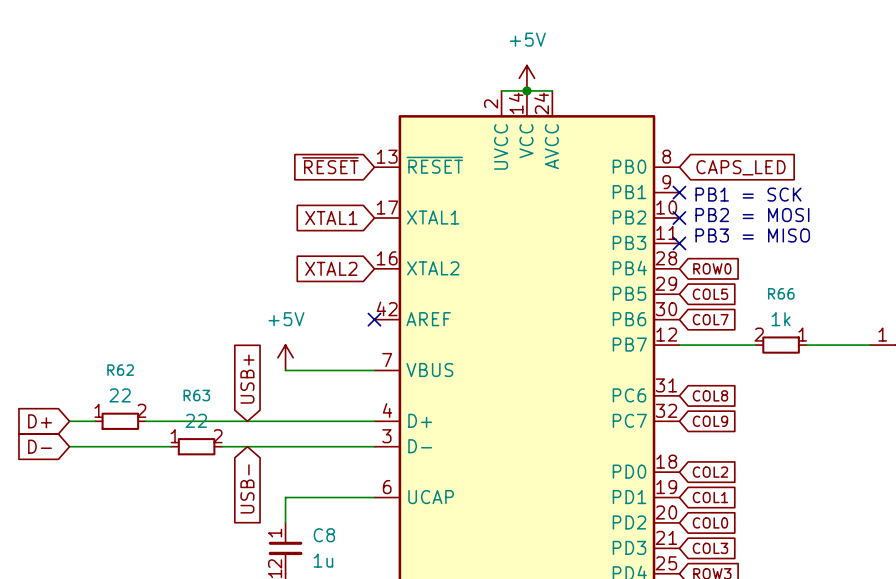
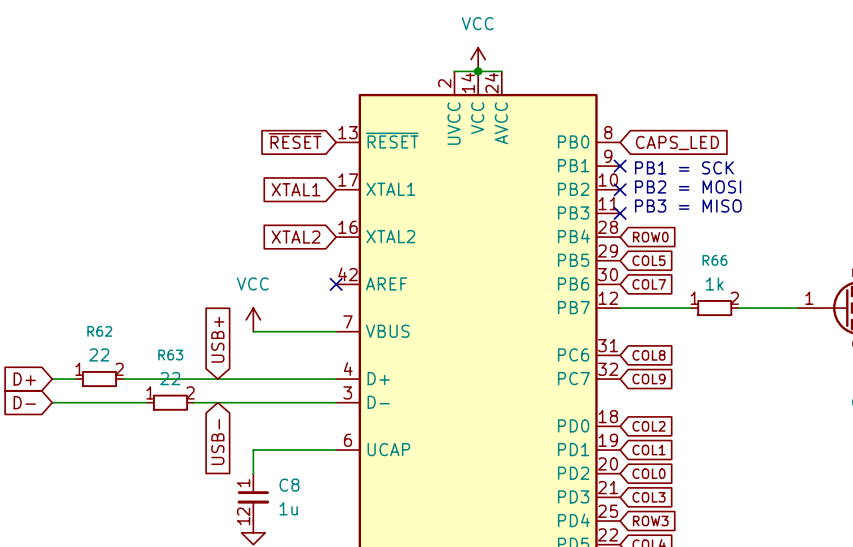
power symbol: +5V (526, 78) -> VCC (478, 59)
R66 rotation: 0° (781, 345) -> 180° (714, 308)
power symbol: +5V (285, 357) -> VCC (253, 319)

